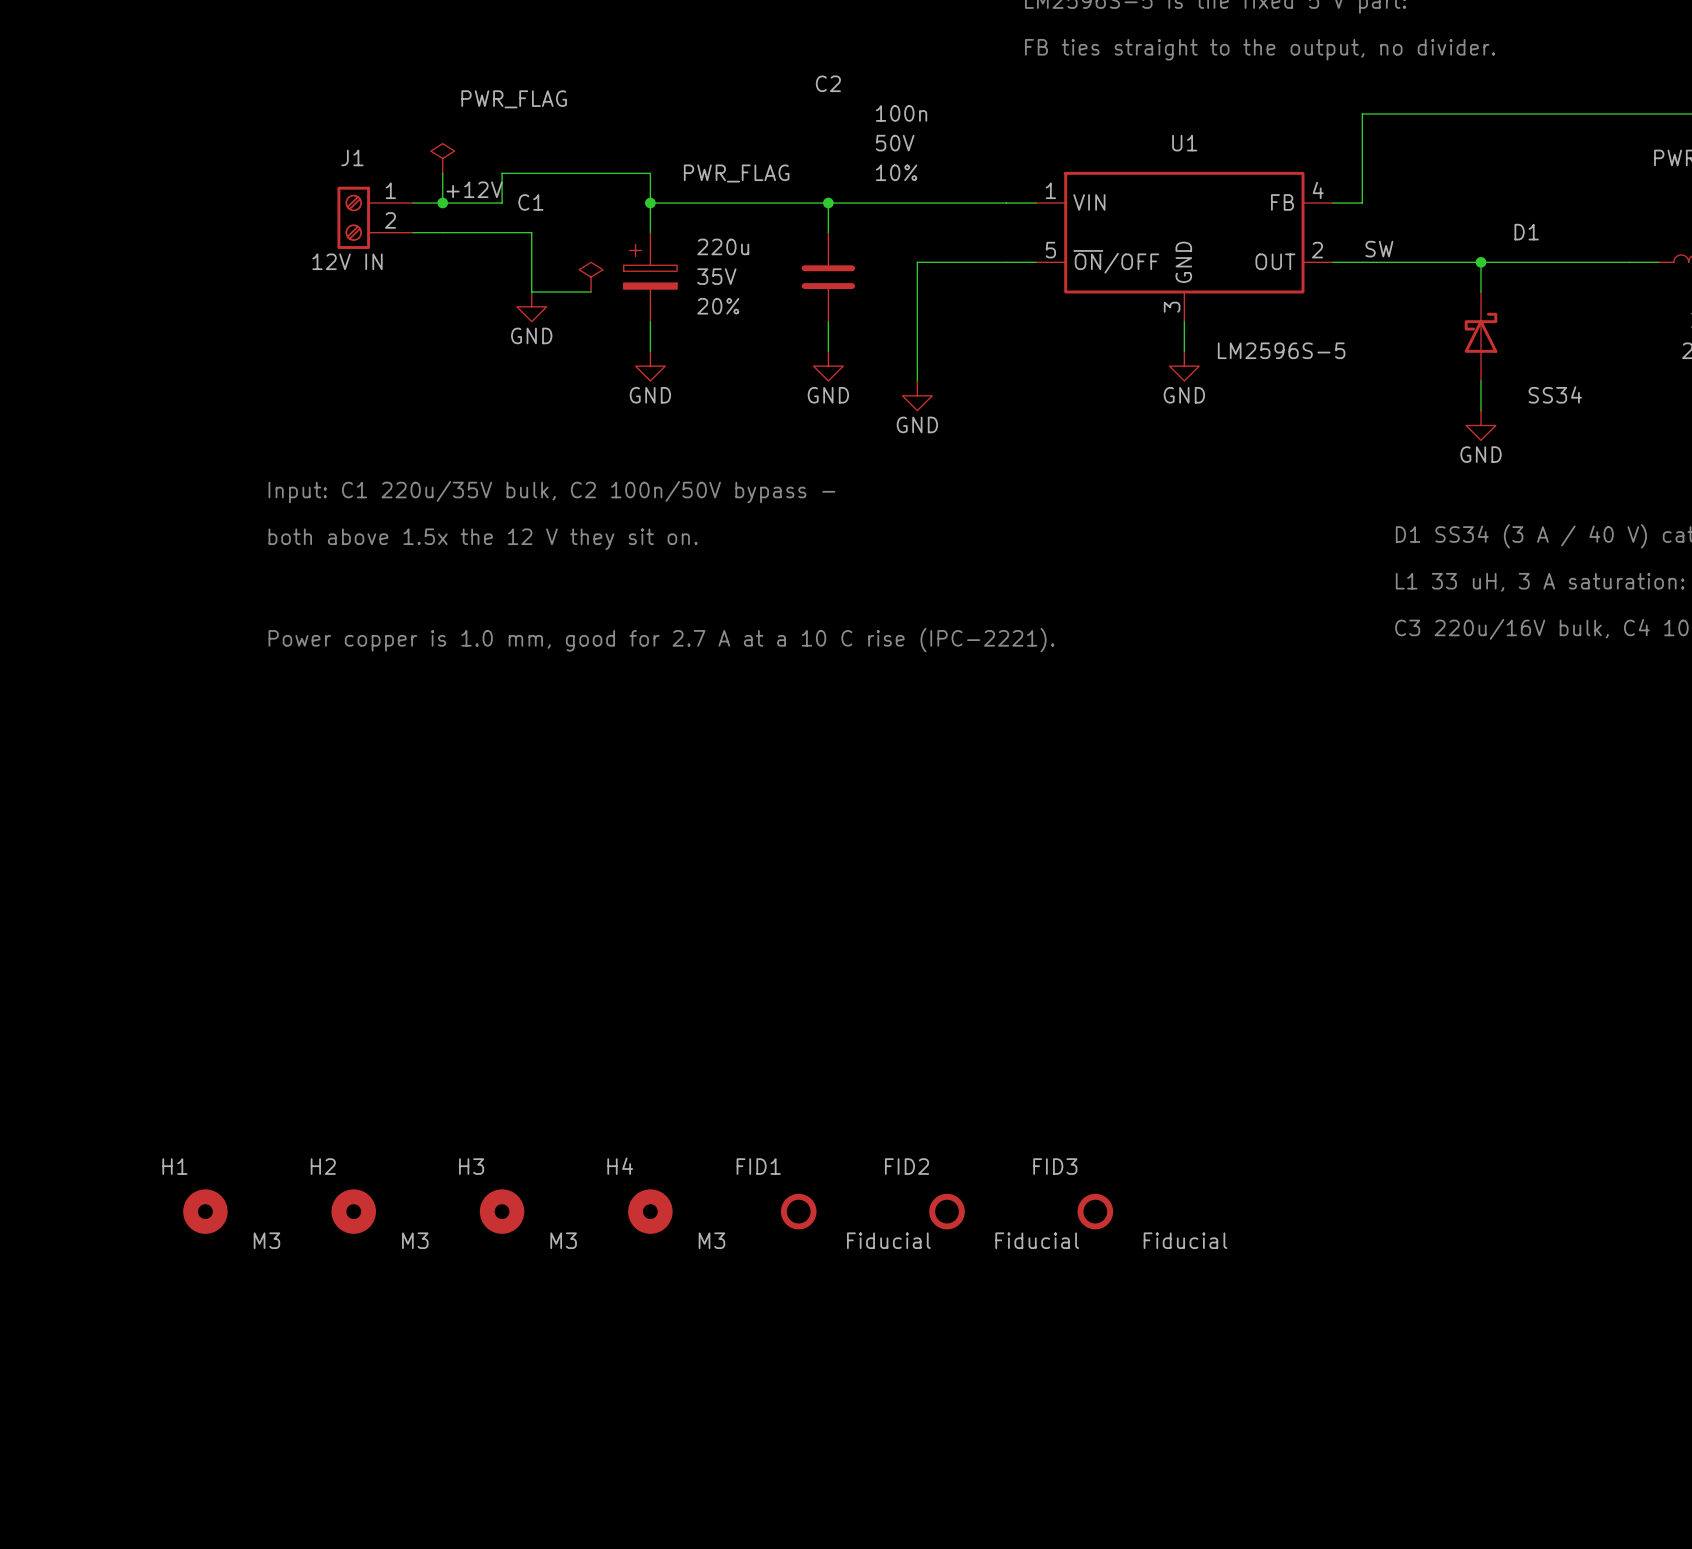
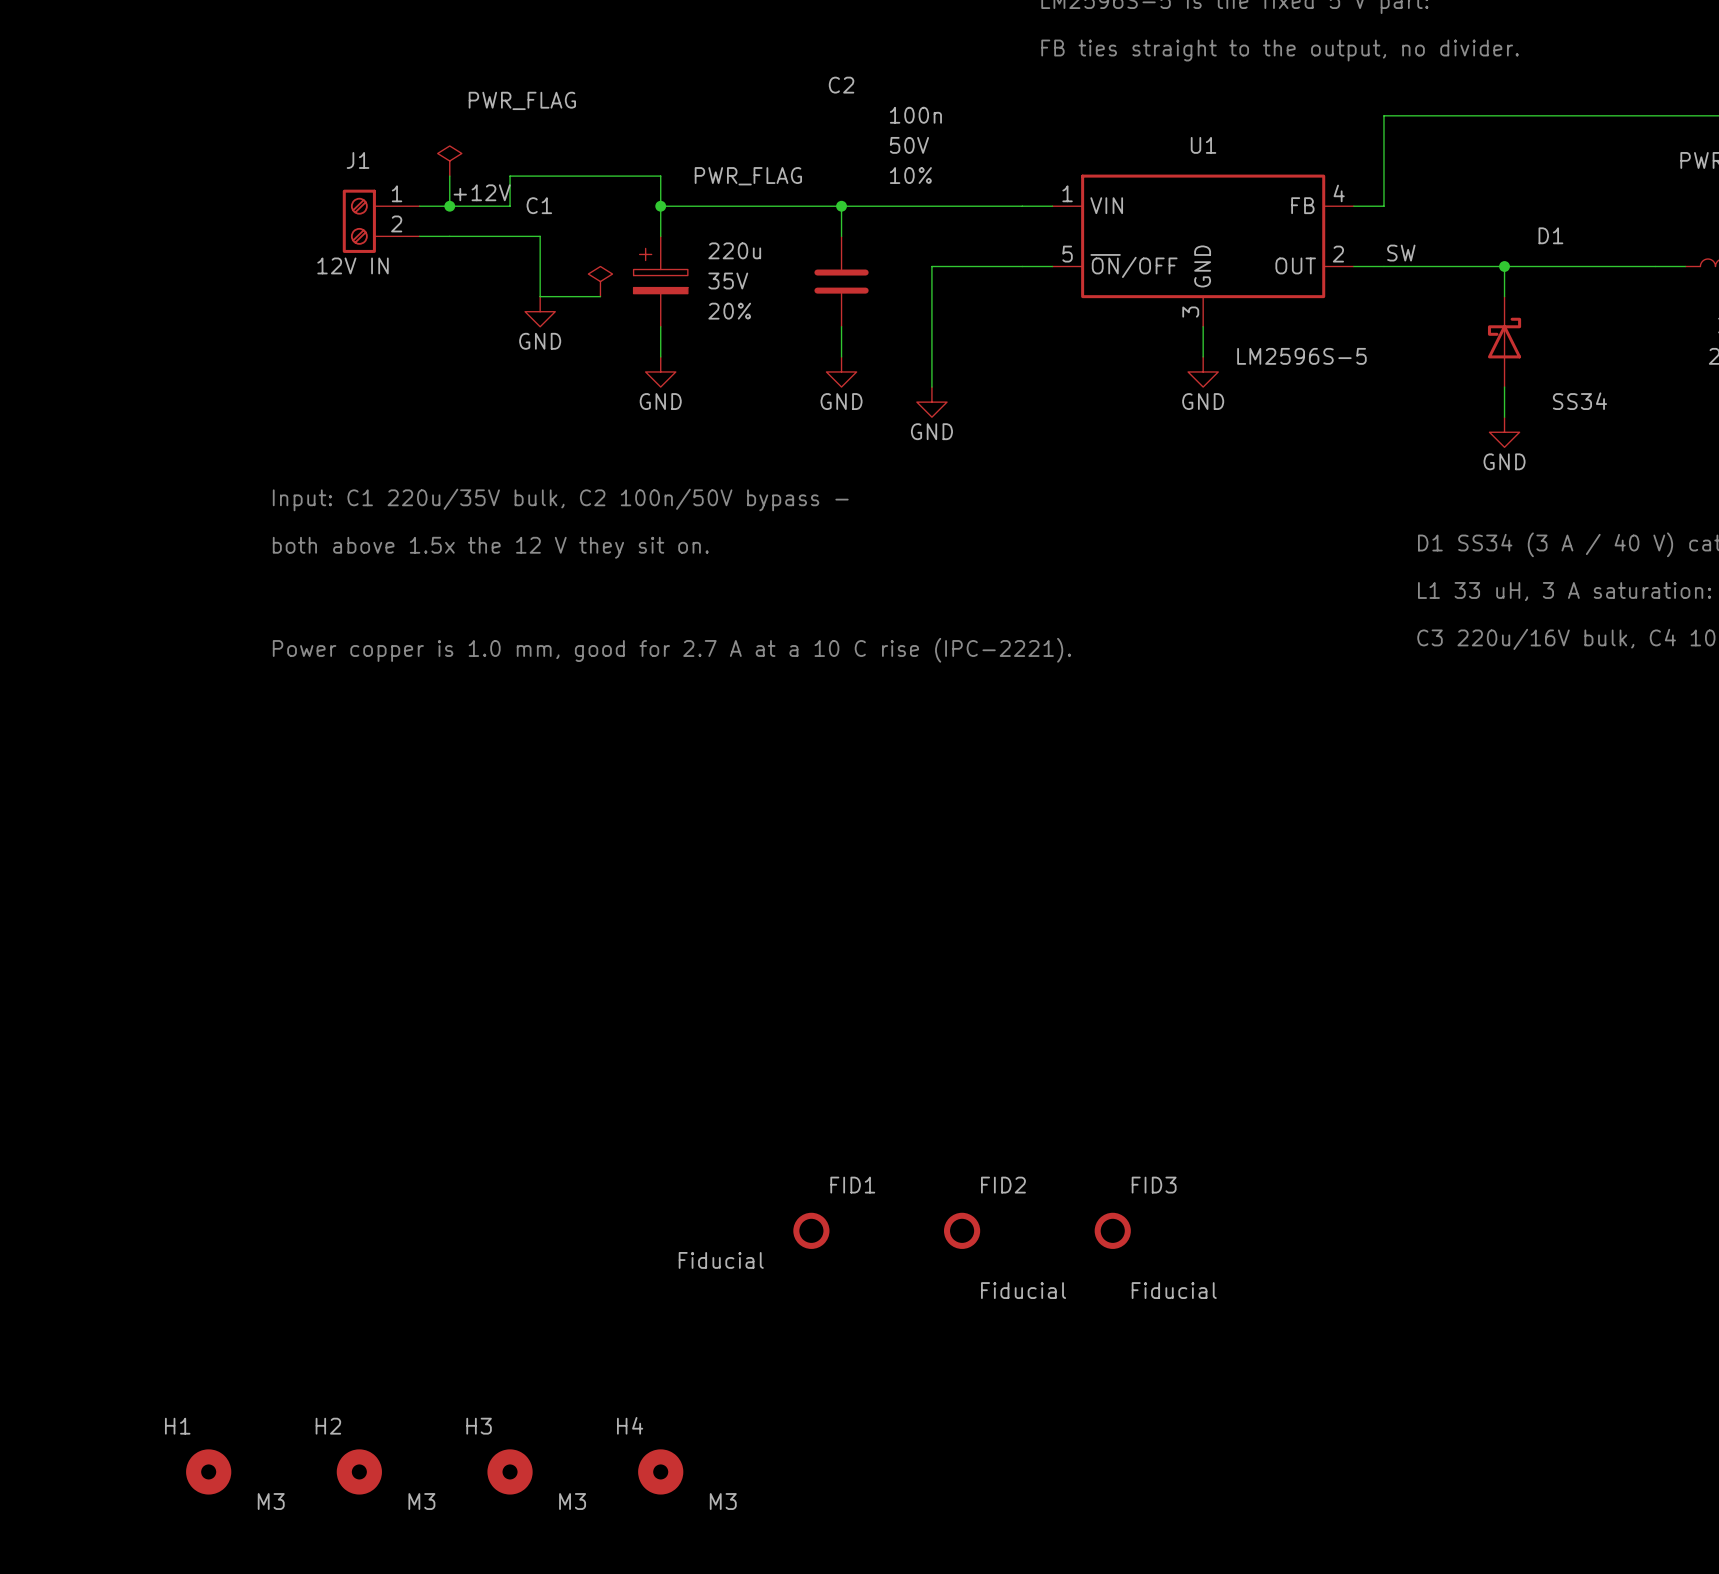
FID1 name position: FID1 (758, 1166) -> FID1 (852, 1185)
FID2 name position: FID2 (907, 1166) -> FID2 (1003, 1185)
FID3 name position: FID3 (1055, 1166) -> FID3 (1154, 1185)
H1 position: (205, 1211) -> (208, 1471)
H2 position: (353, 1211) -> (359, 1471)
H3 position: (502, 1211) -> (510, 1471)
H4 position: (650, 1211) -> (660, 1471)
FID1 value position: Fiducial (888, 1240) -> Fiducial (721, 1260)
FID2 value position: Fiducial (1037, 1240) -> Fiducial (1023, 1290)
FID3 value position: Fiducial (1185, 1240) -> Fiducial (1174, 1290)

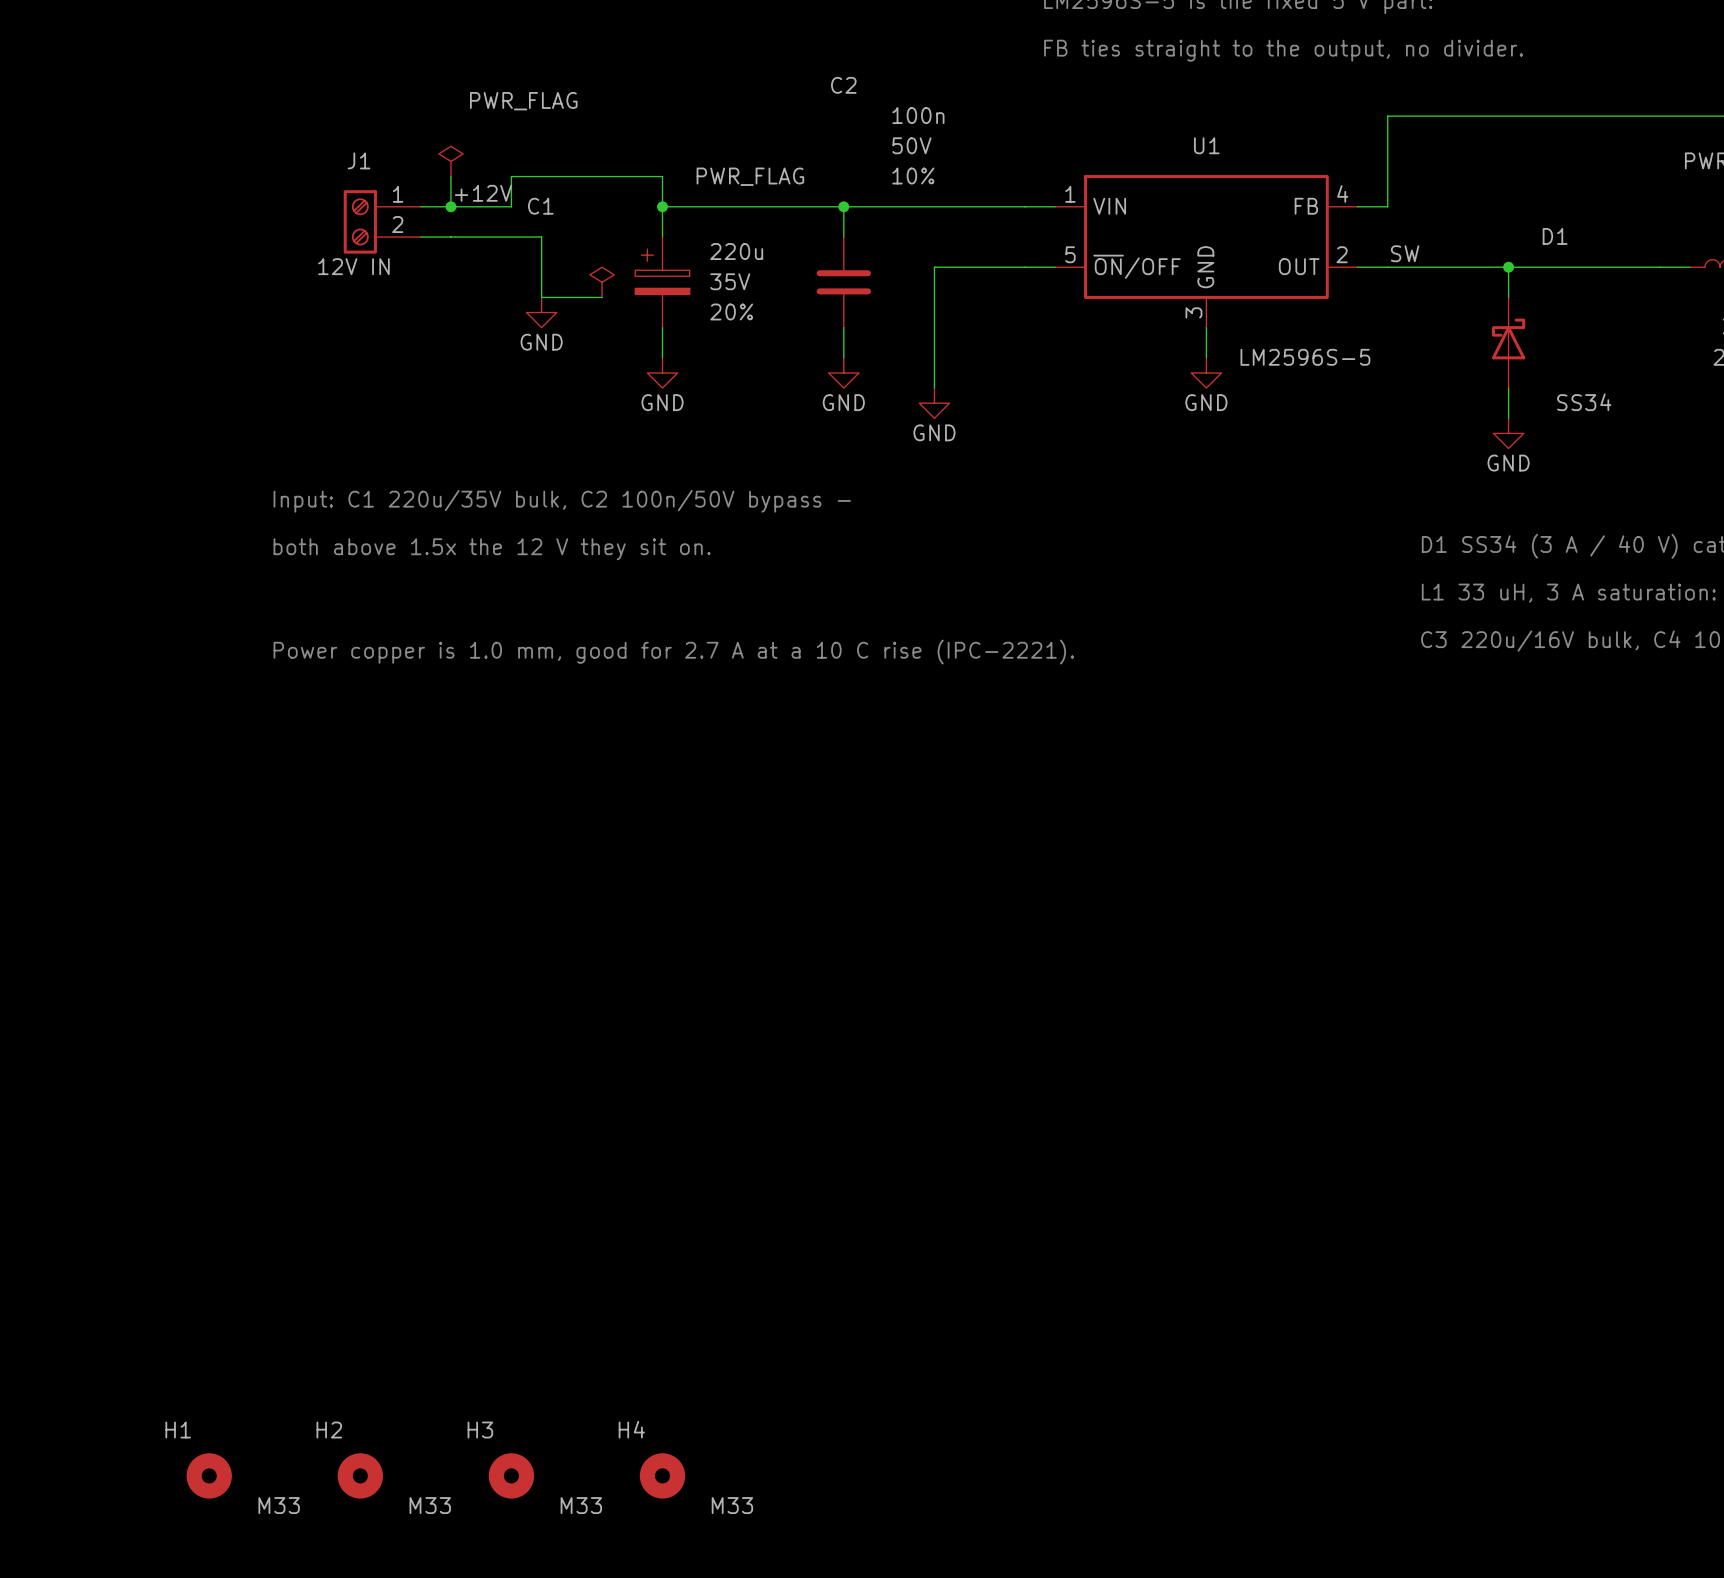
FID1: Fiducial (811, 1230) -> none
FID2: Fiducial (962, 1230) -> none
FID3: Fiducial (1112, 1230) -> none
H1 value: M3 (271, 1501) -> M33 (279, 1505)
H2 value: M3 (421, 1501) -> M33 (430, 1505)
H3 value: M3 (572, 1501) -> M33 (581, 1505)
H4 value: M3 (723, 1501) -> M33 (732, 1505)

